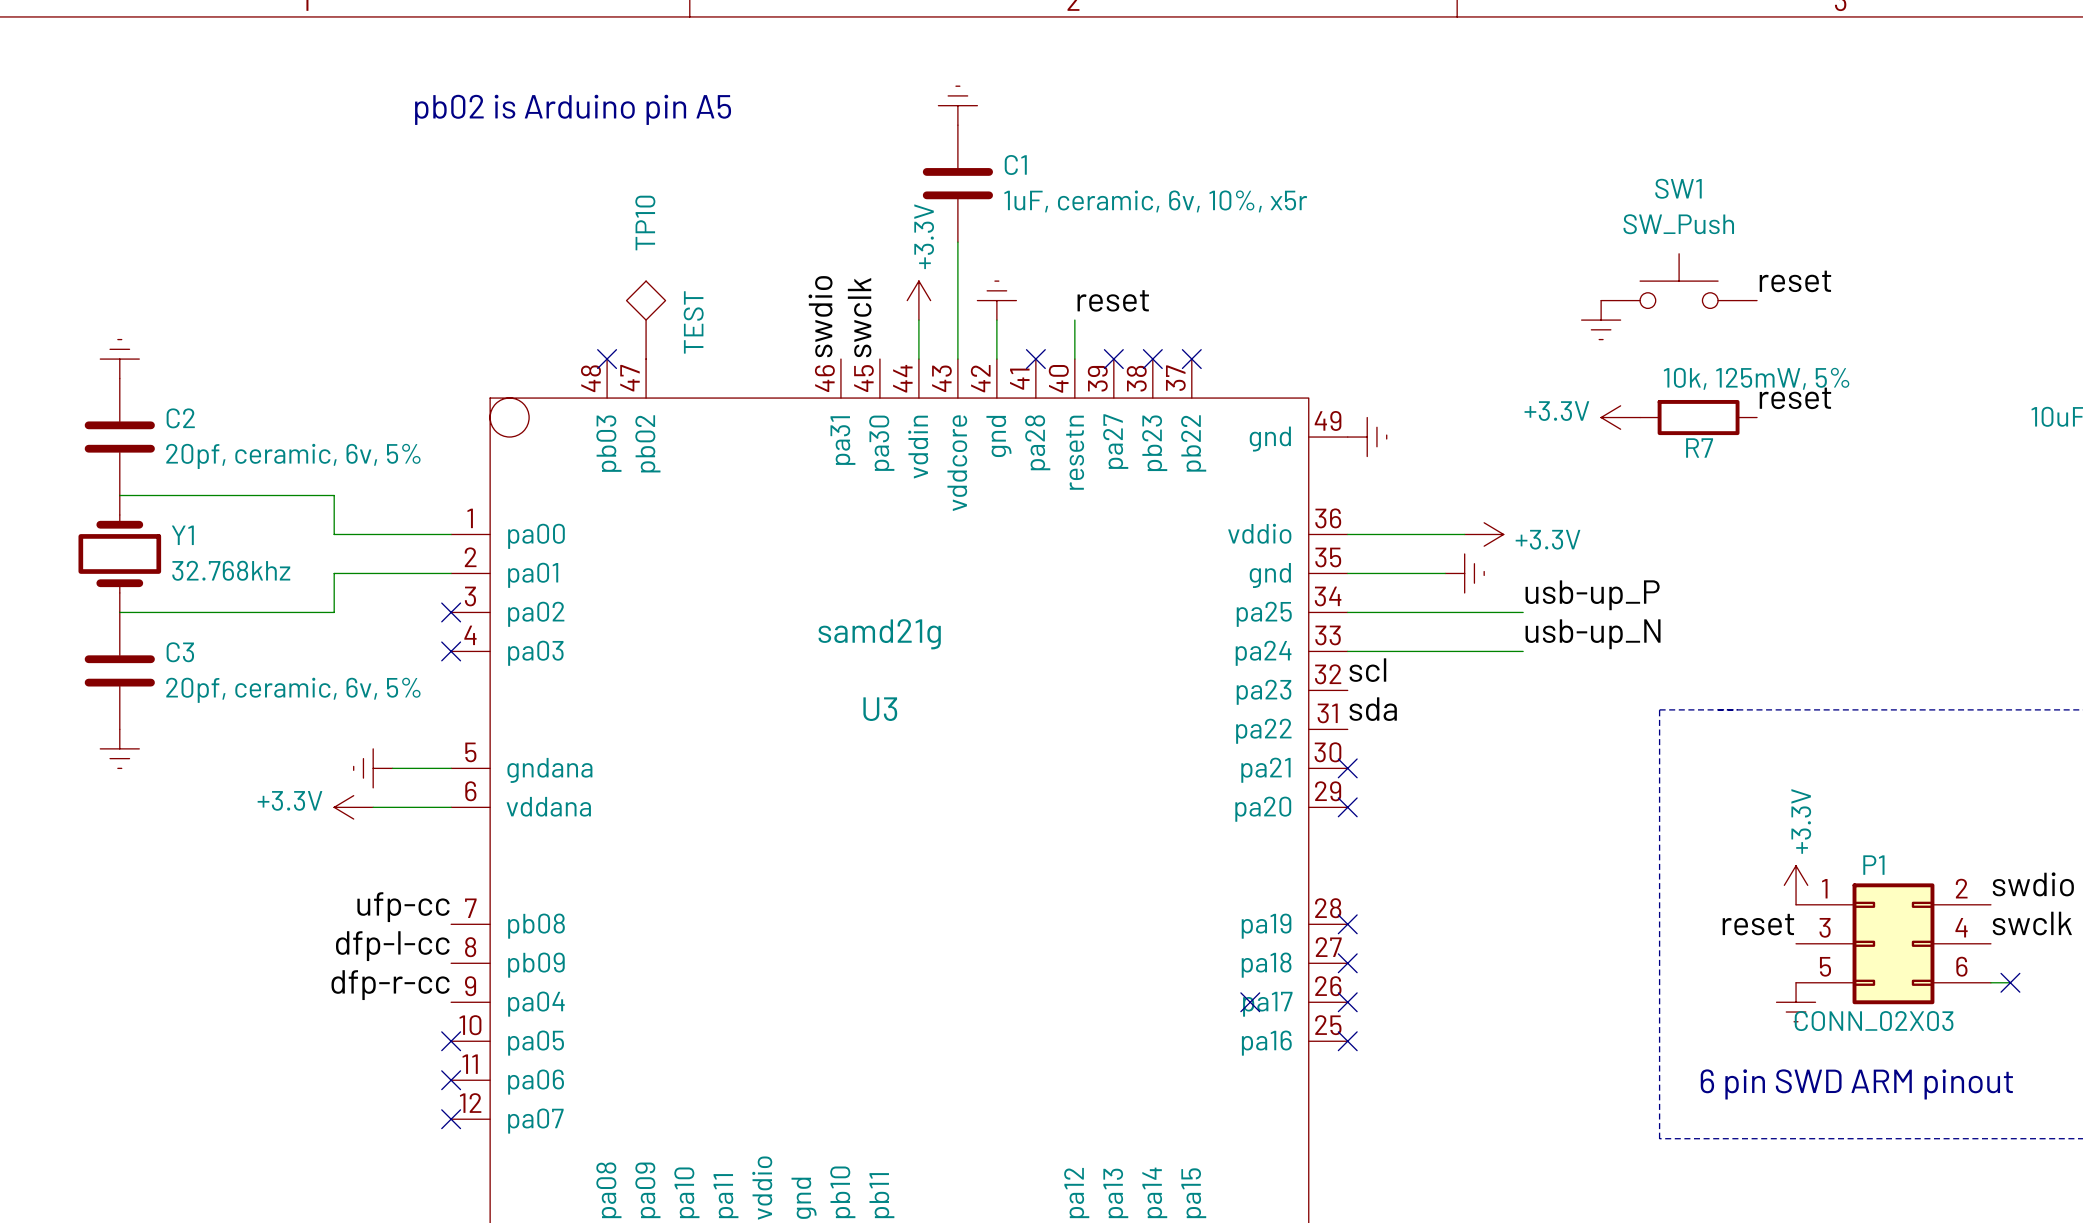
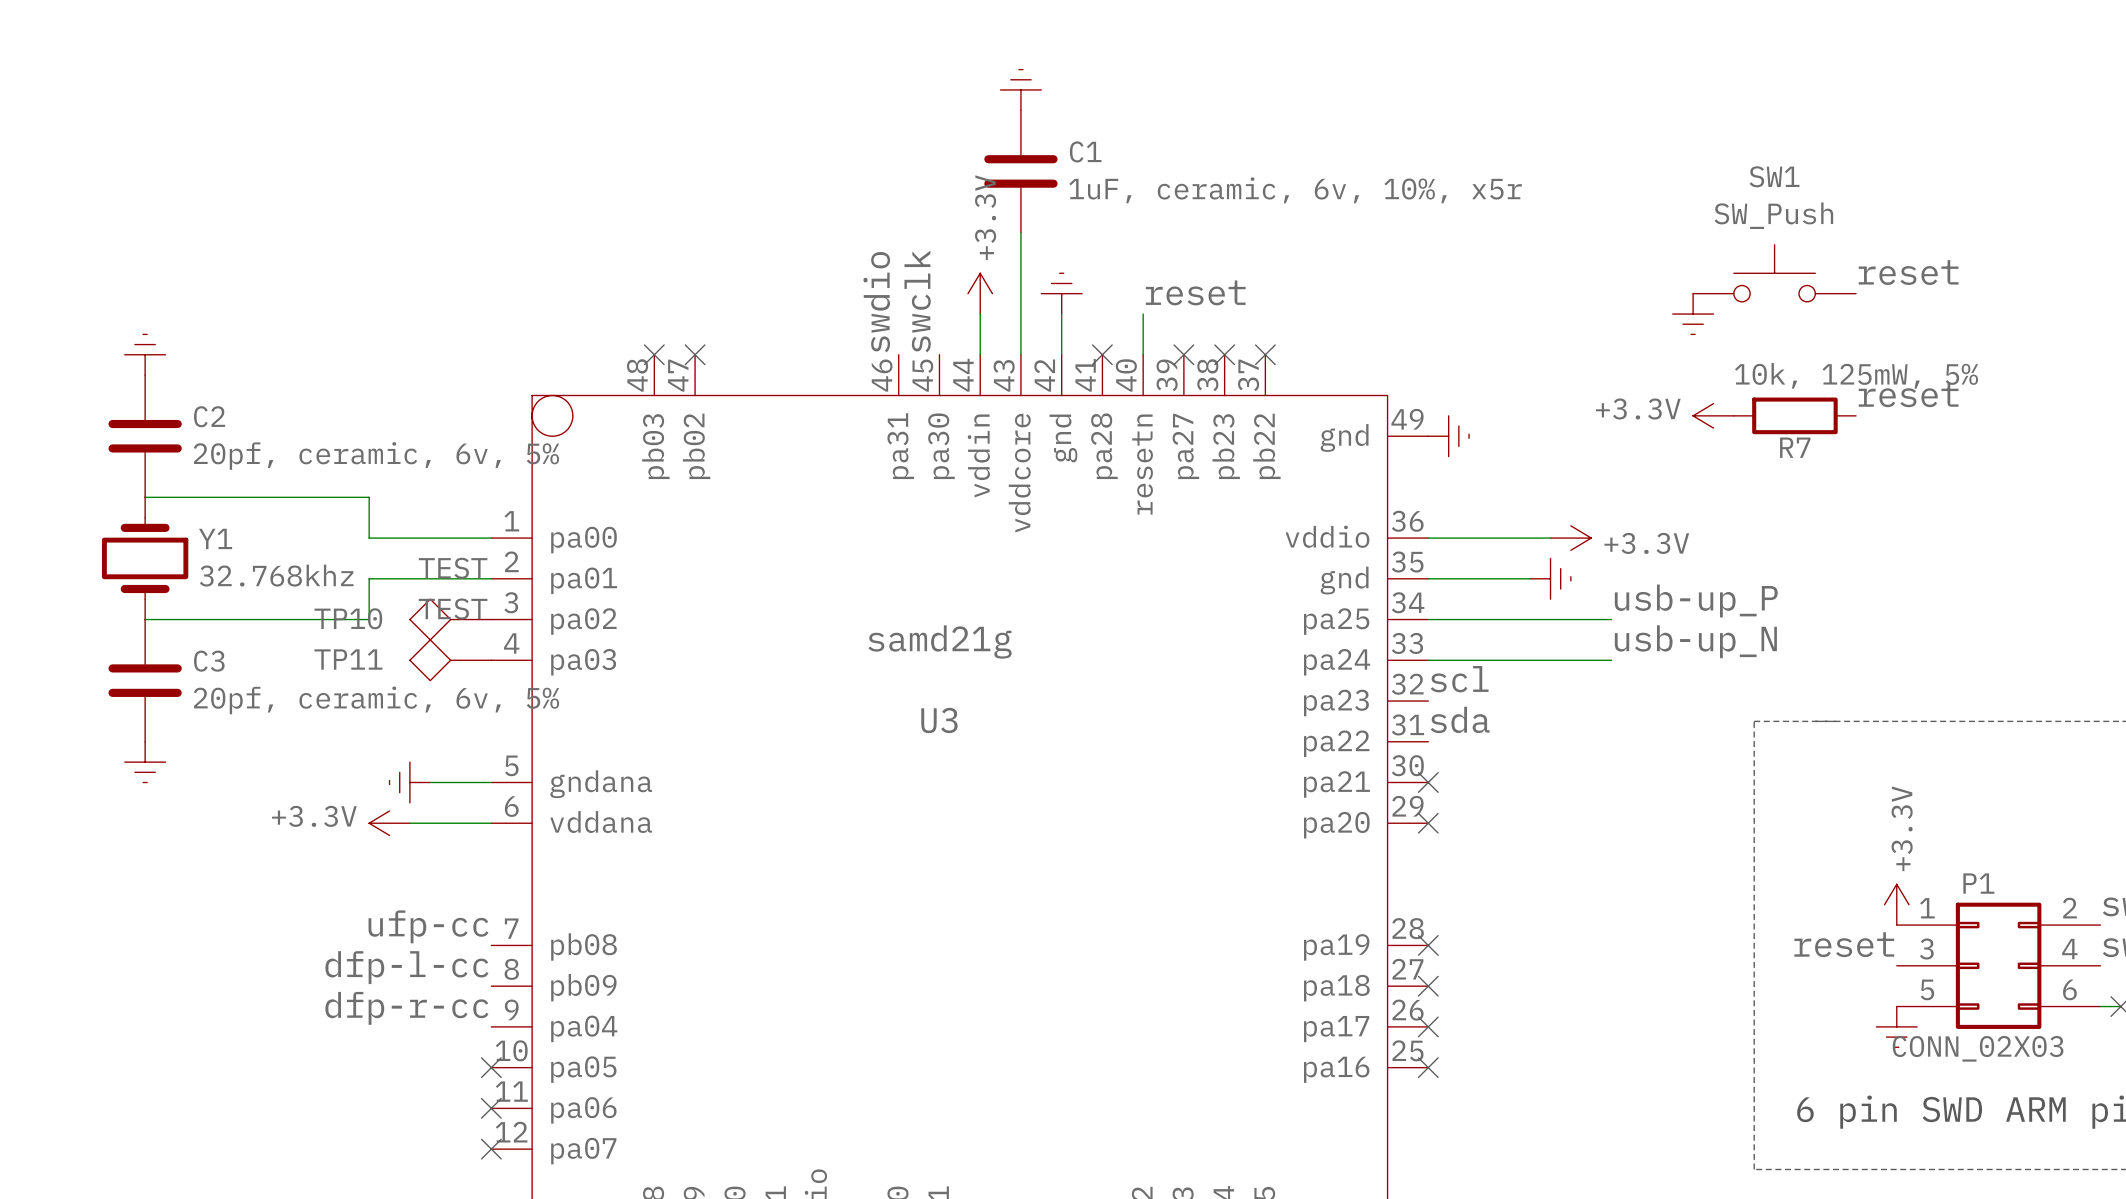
text: pb02 is Arduino pin A5 (573, 109) -> none
TP10 rotation: 0° (646, 300) -> 90° counterclockwise (430, 619)
TP10 position: (646, 320) -> (450, 619)
no-connect mark: none -> (695, 354)
no-connect mark: (451, 612) -> none
TP11: none -> TEST (450, 660)
no-connect mark: (451, 651) -> none
no-connect mark: (1250, 1002) -> none

